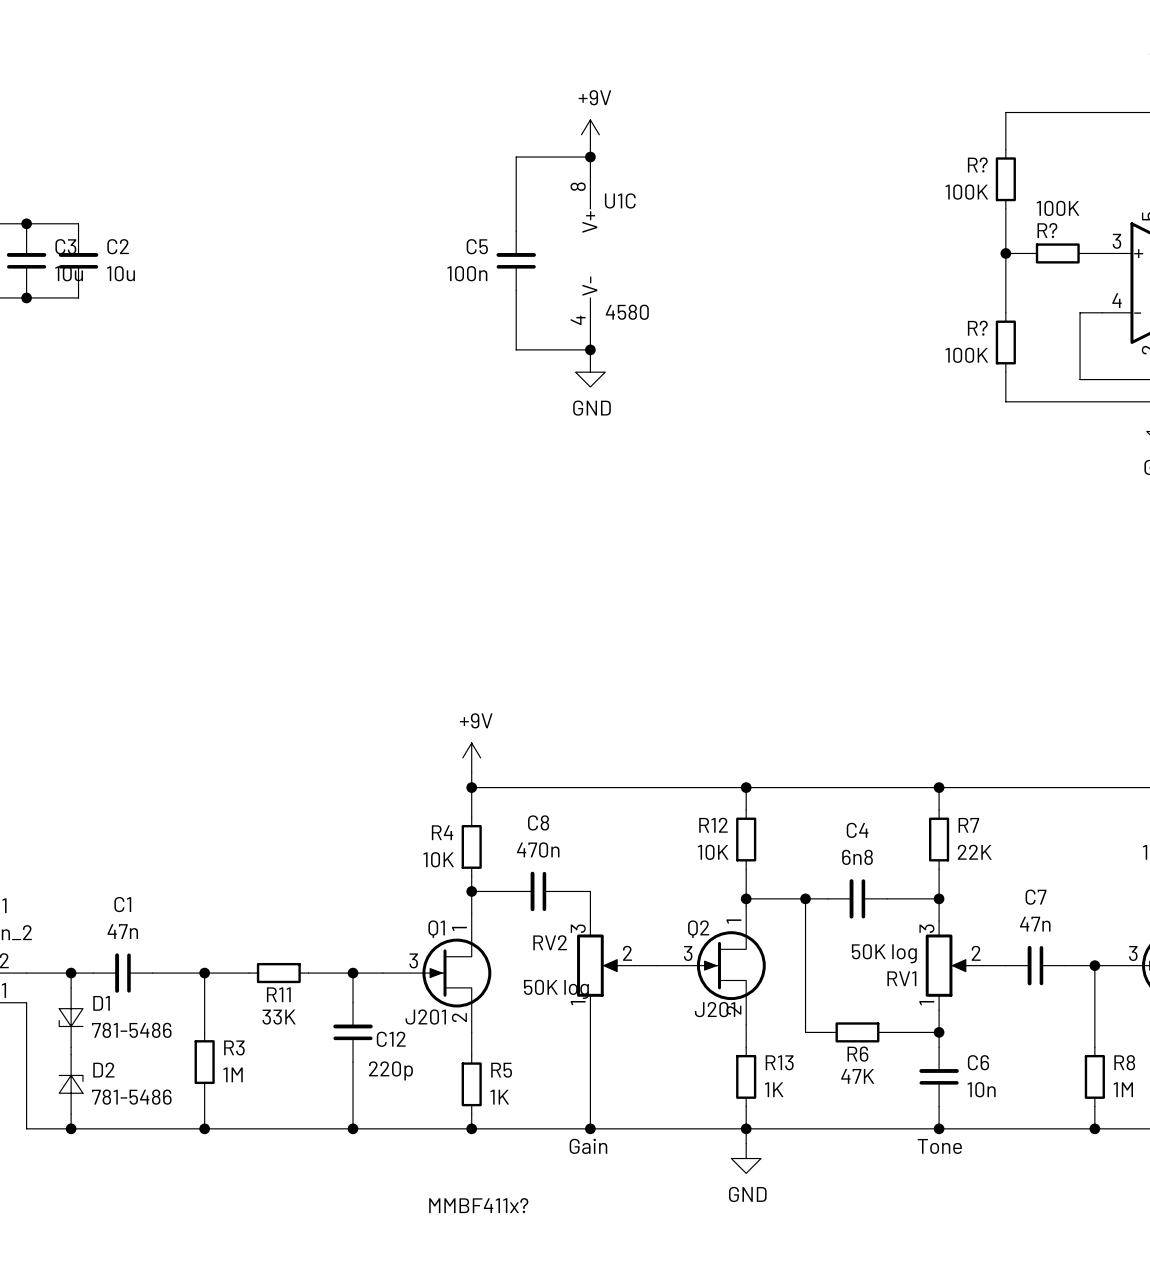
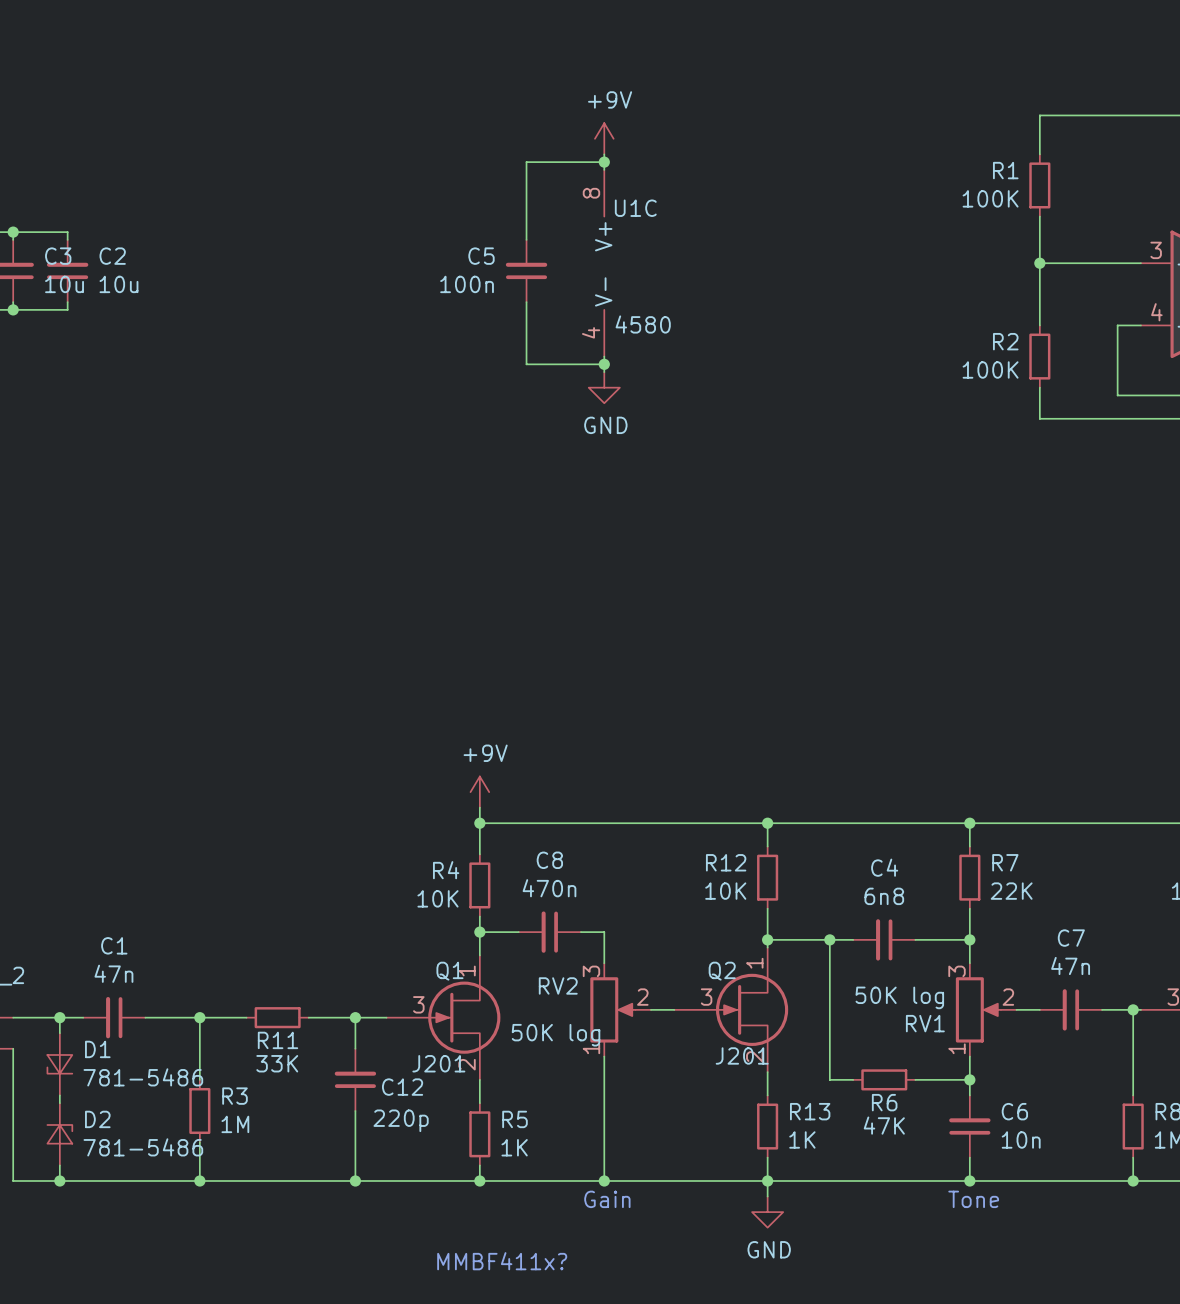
R? name: R? (977, 164) -> R1 (1005, 170)
wire: none -> (1063, 263) (1125, 263)
R?: 100K (1057, 253) -> none
R? name: R? (977, 328) -> R2 (1005, 341)

